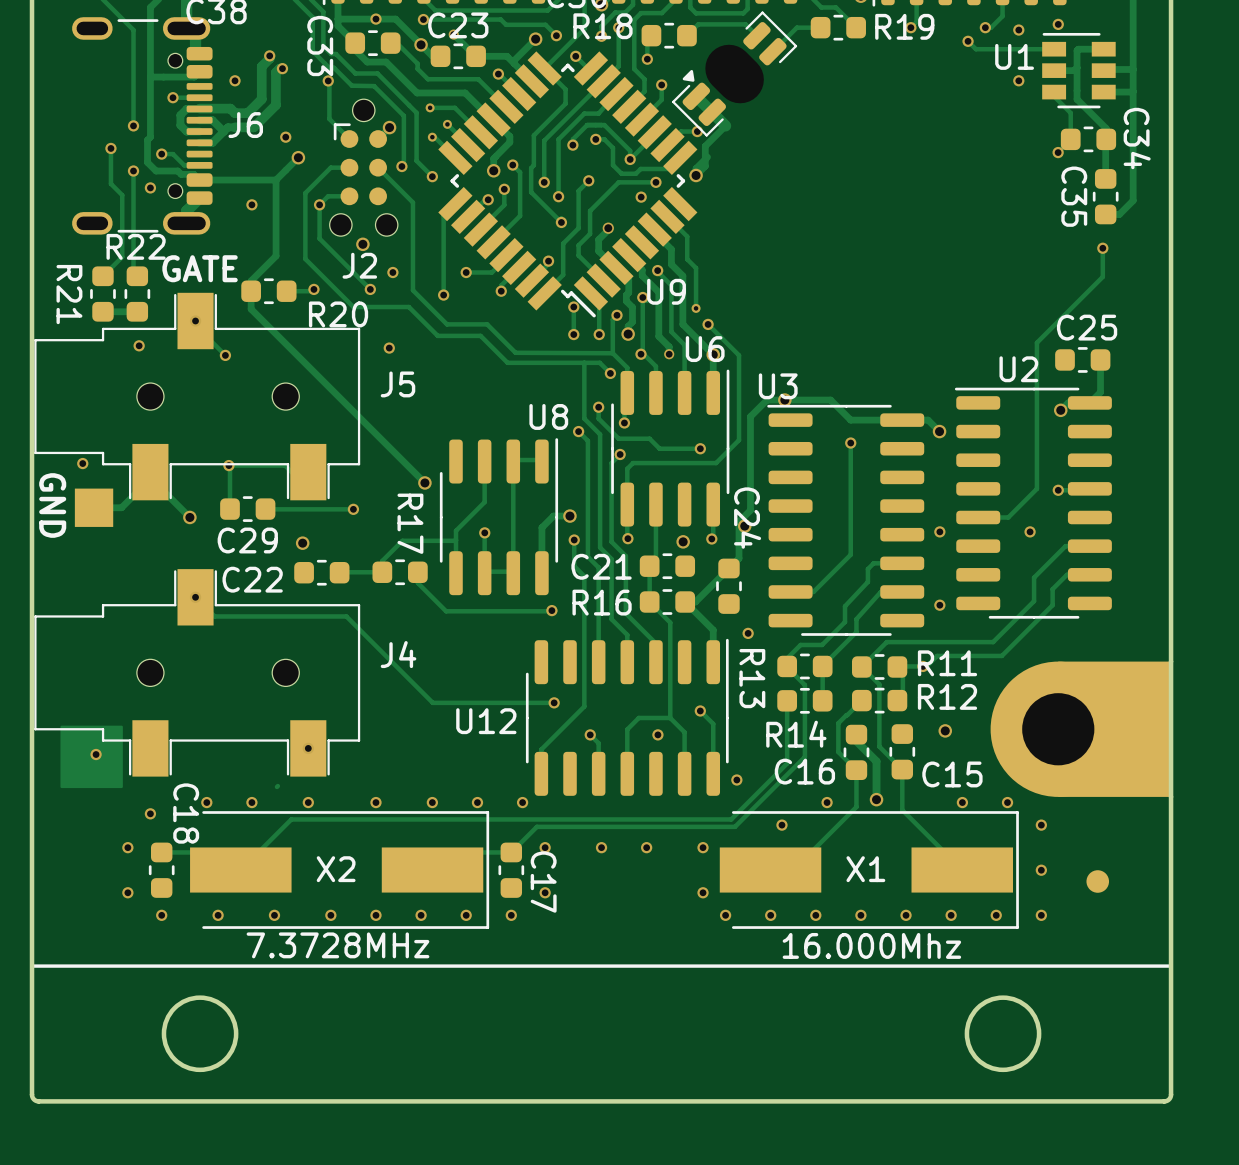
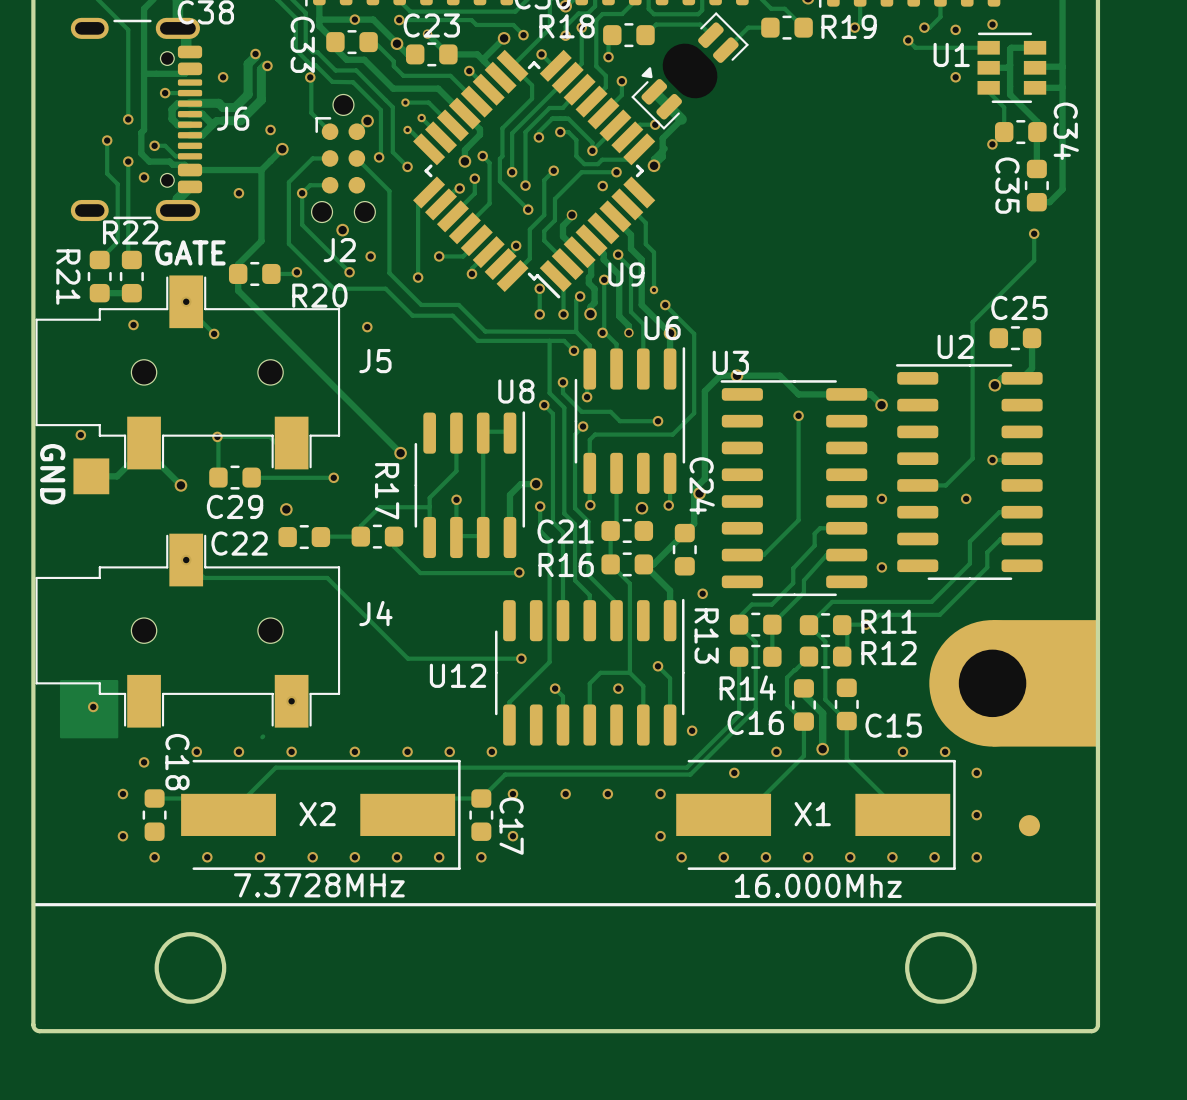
via: (945, 730) -> none

